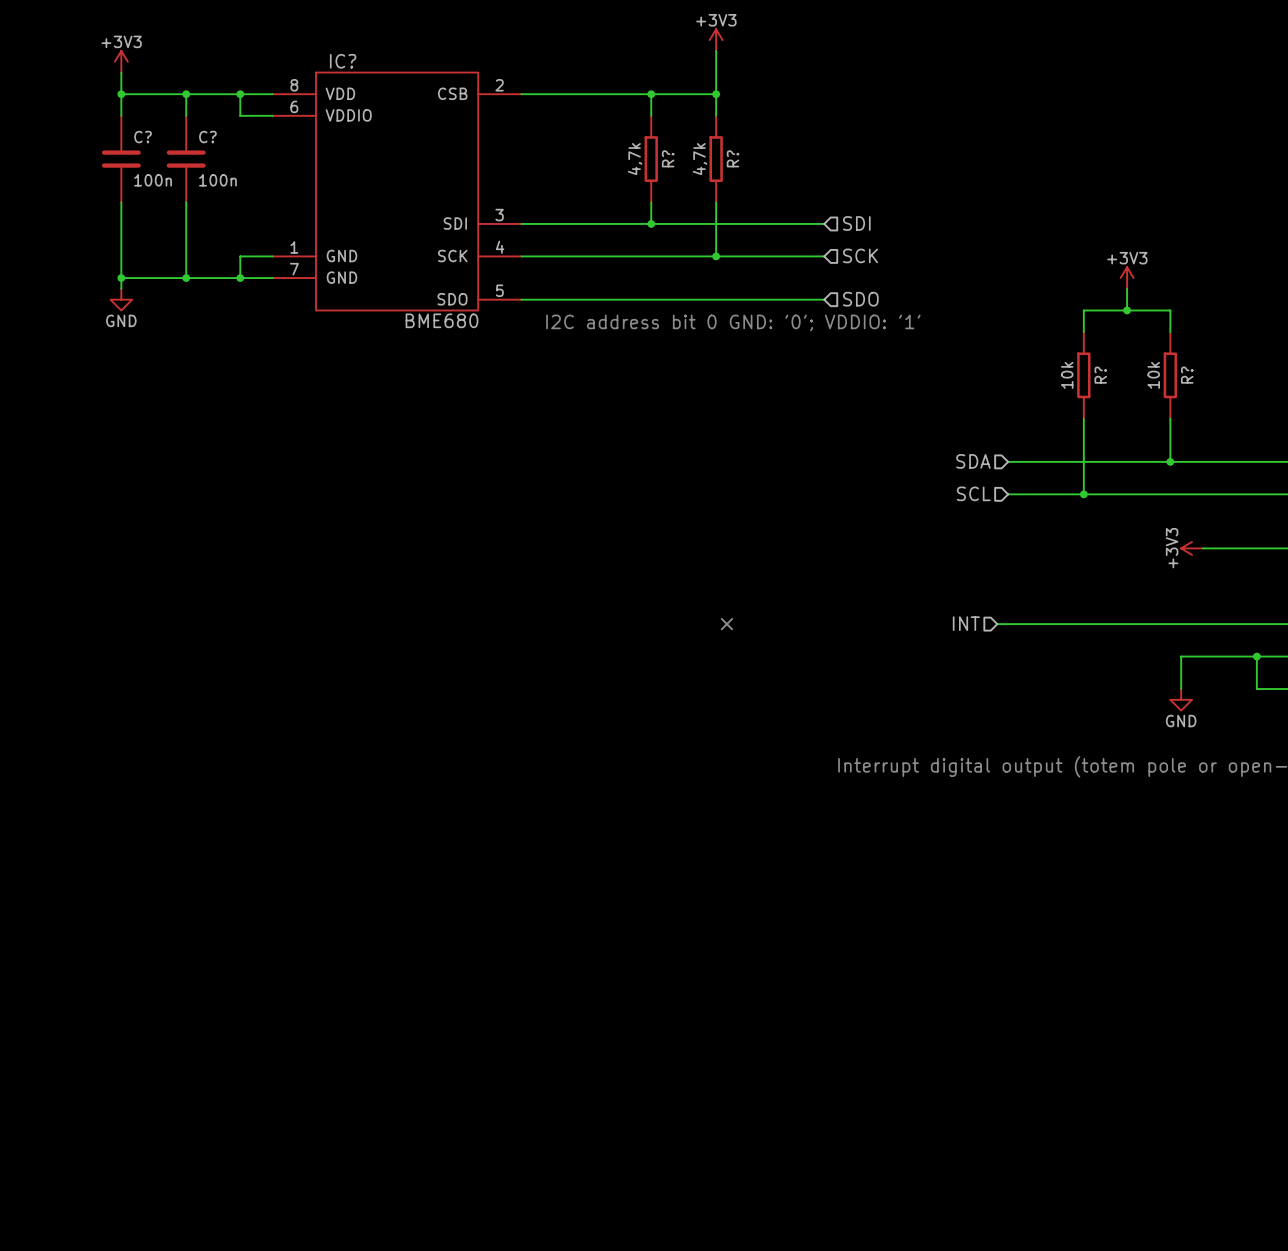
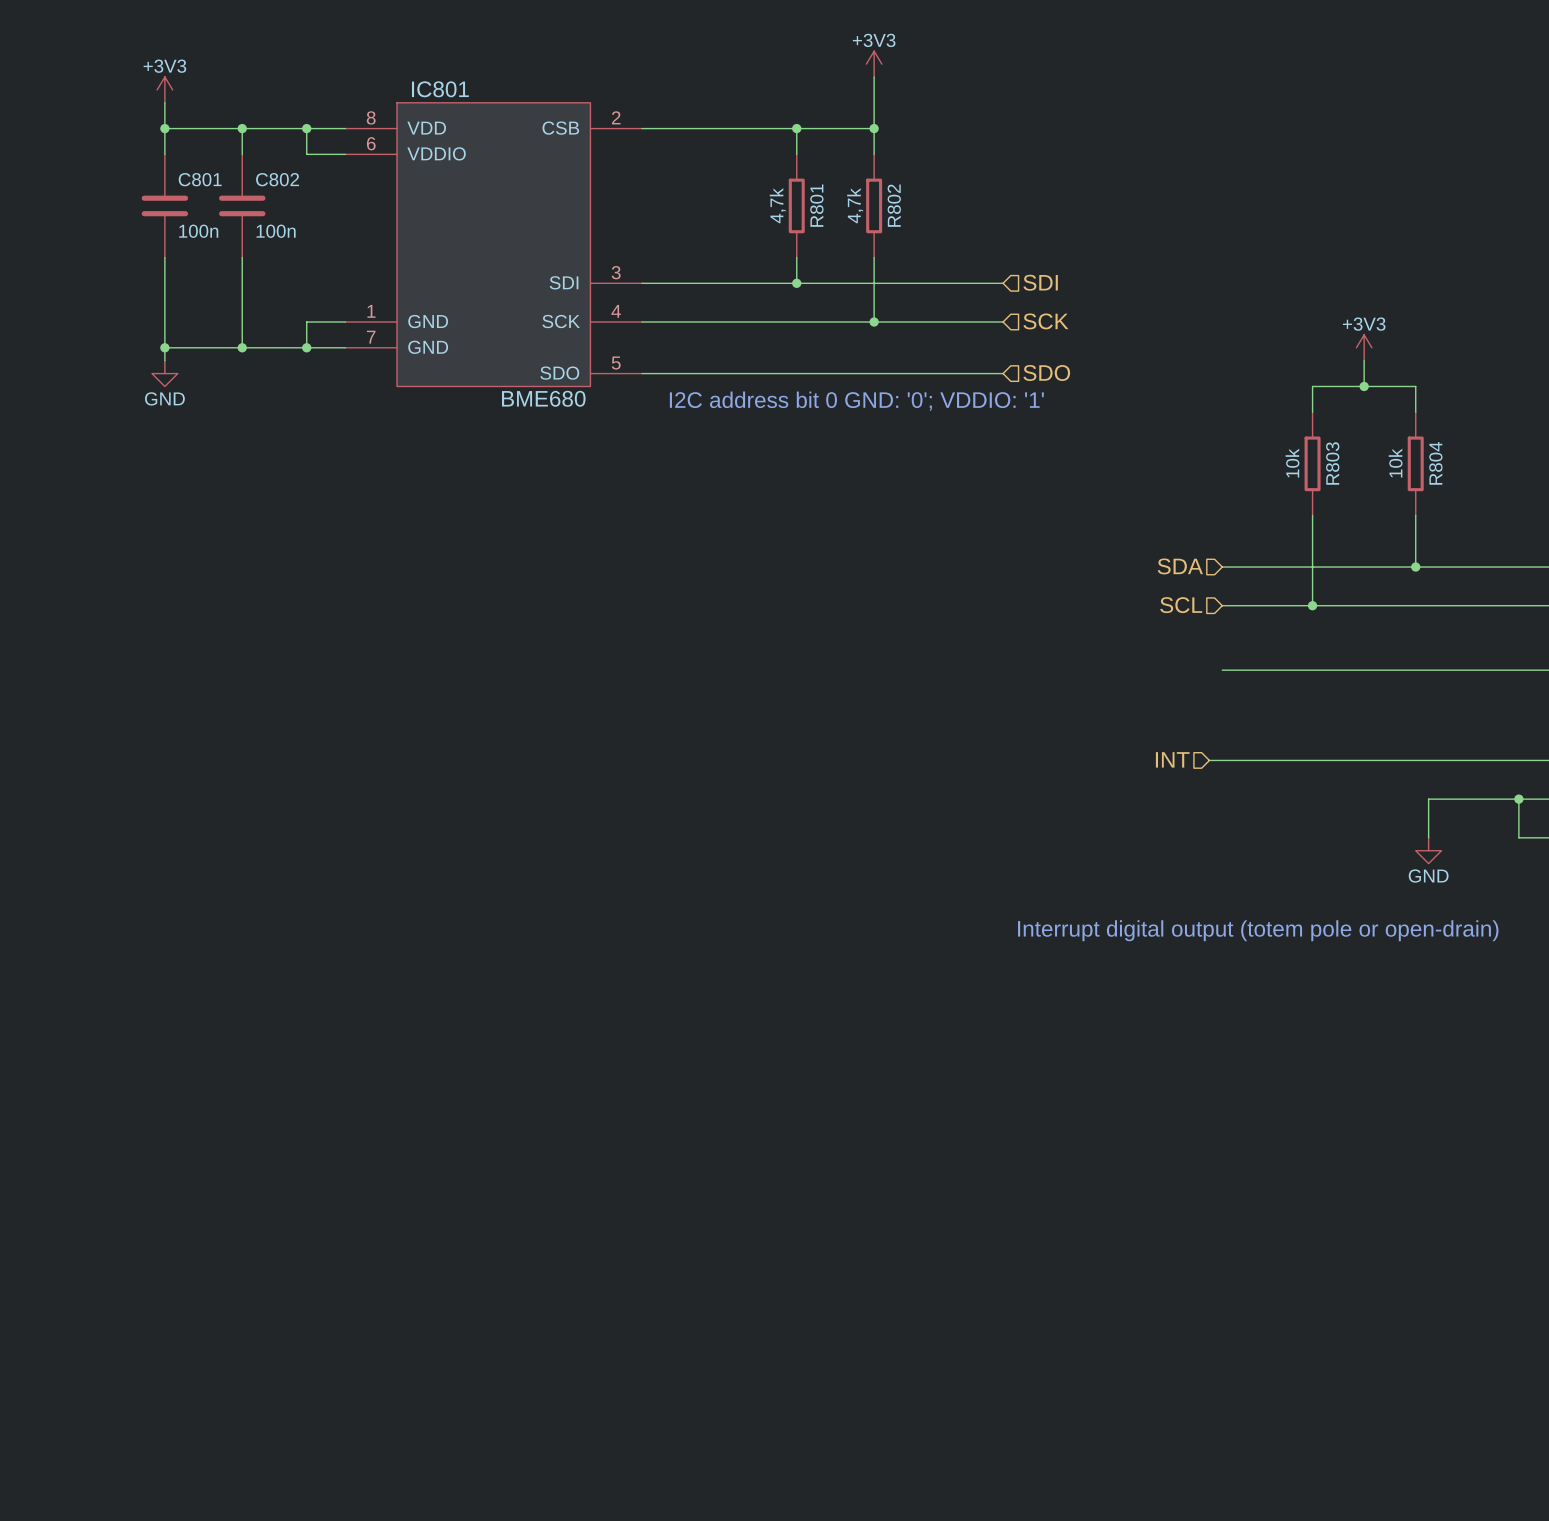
IC? name: IC? (343, 61) -> IC801 (440, 89)
C? name: C? (143, 137) -> C801 (200, 179)
C? name: C? (207, 137) -> C802 (277, 179)
R? name: R? (668, 158) -> R801 (816, 205)
R? name: R? (733, 158) -> R802 (894, 205)
R? name: R? (1100, 375) -> R803 (1332, 463)
R? name: R? (1187, 375) -> R804 (1435, 463)
wire: none -> (1222, 670) (1454, 670)
power symbol: +3V3 (1191, 548) -> none
no-connect mark: (726, 624) -> none

